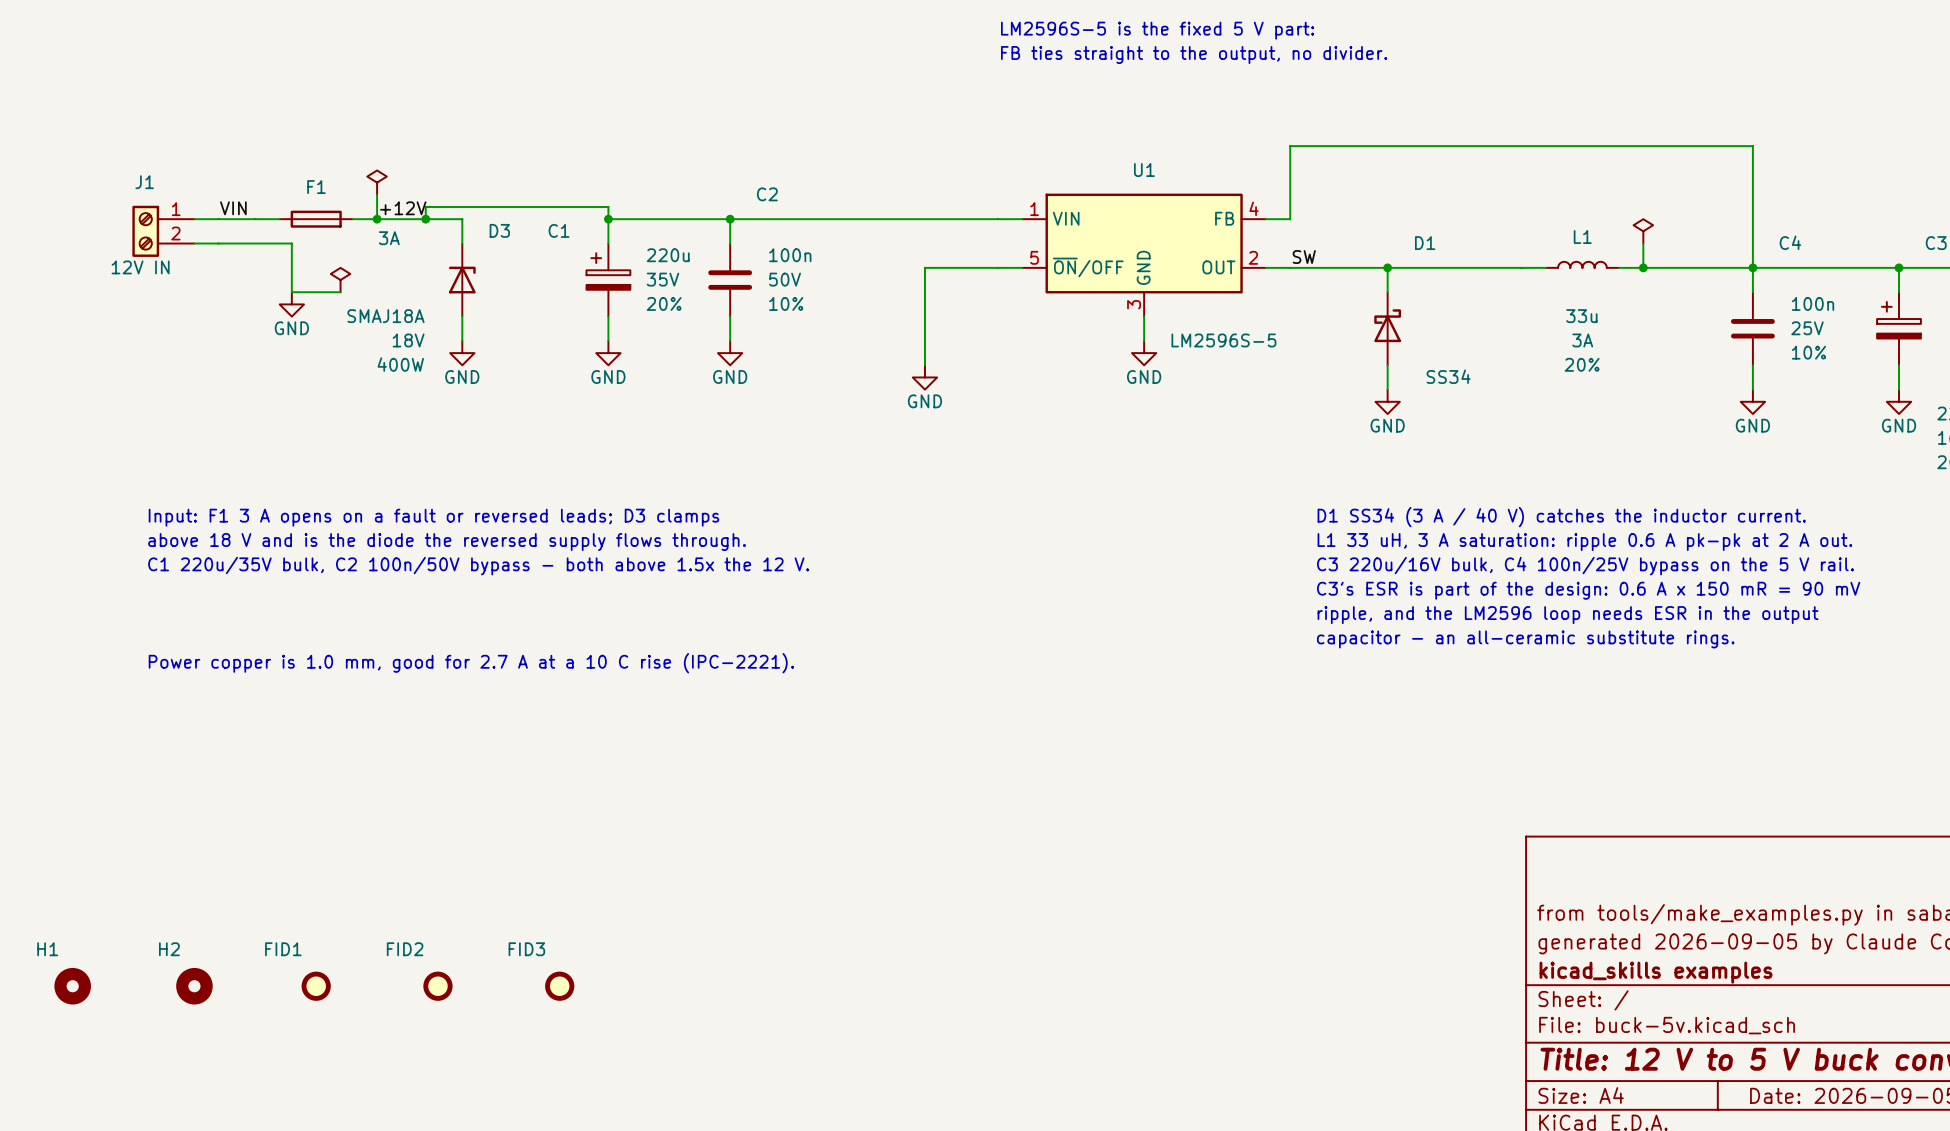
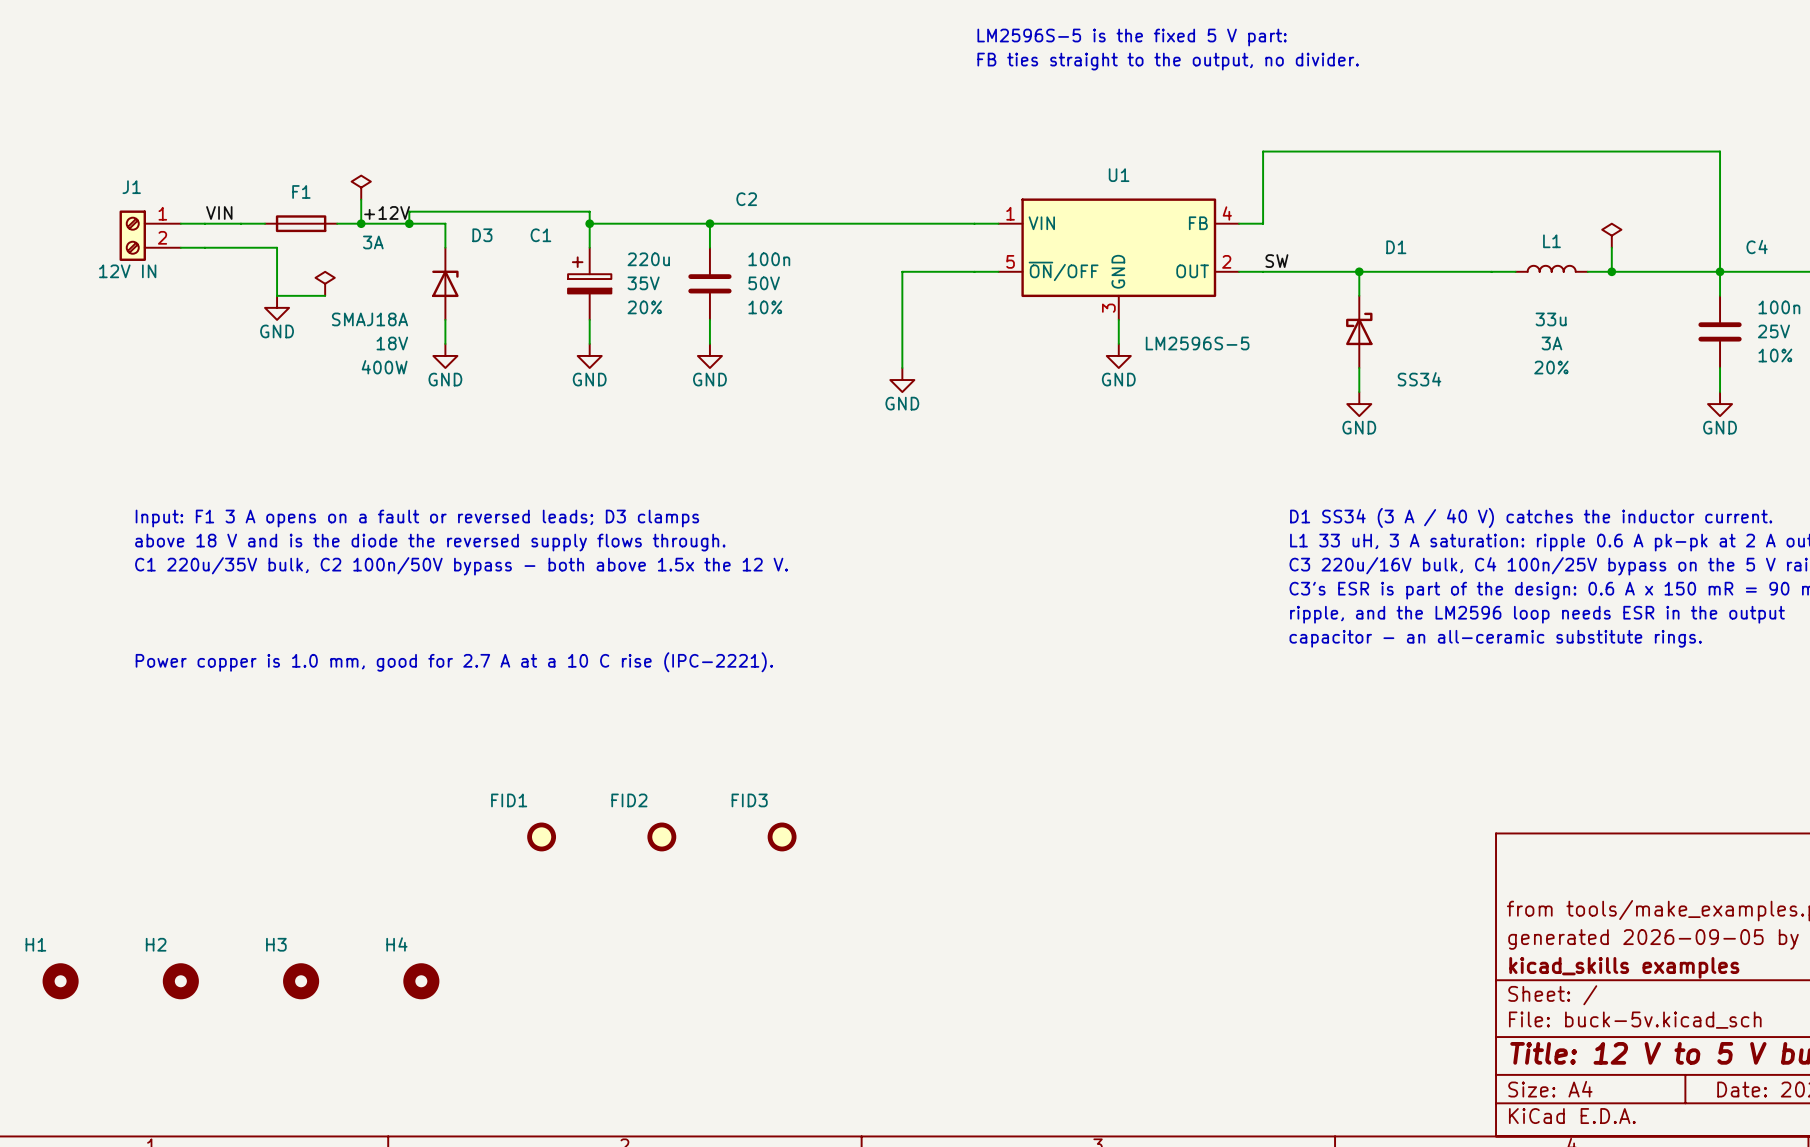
FID1 position: (316, 986) -> (541, 836)
H3: none -> (301, 981)
FID2 position: (437, 986) -> (661, 836)
H4: none -> (421, 981)
FID3 position: (559, 986) -> (782, 836)

